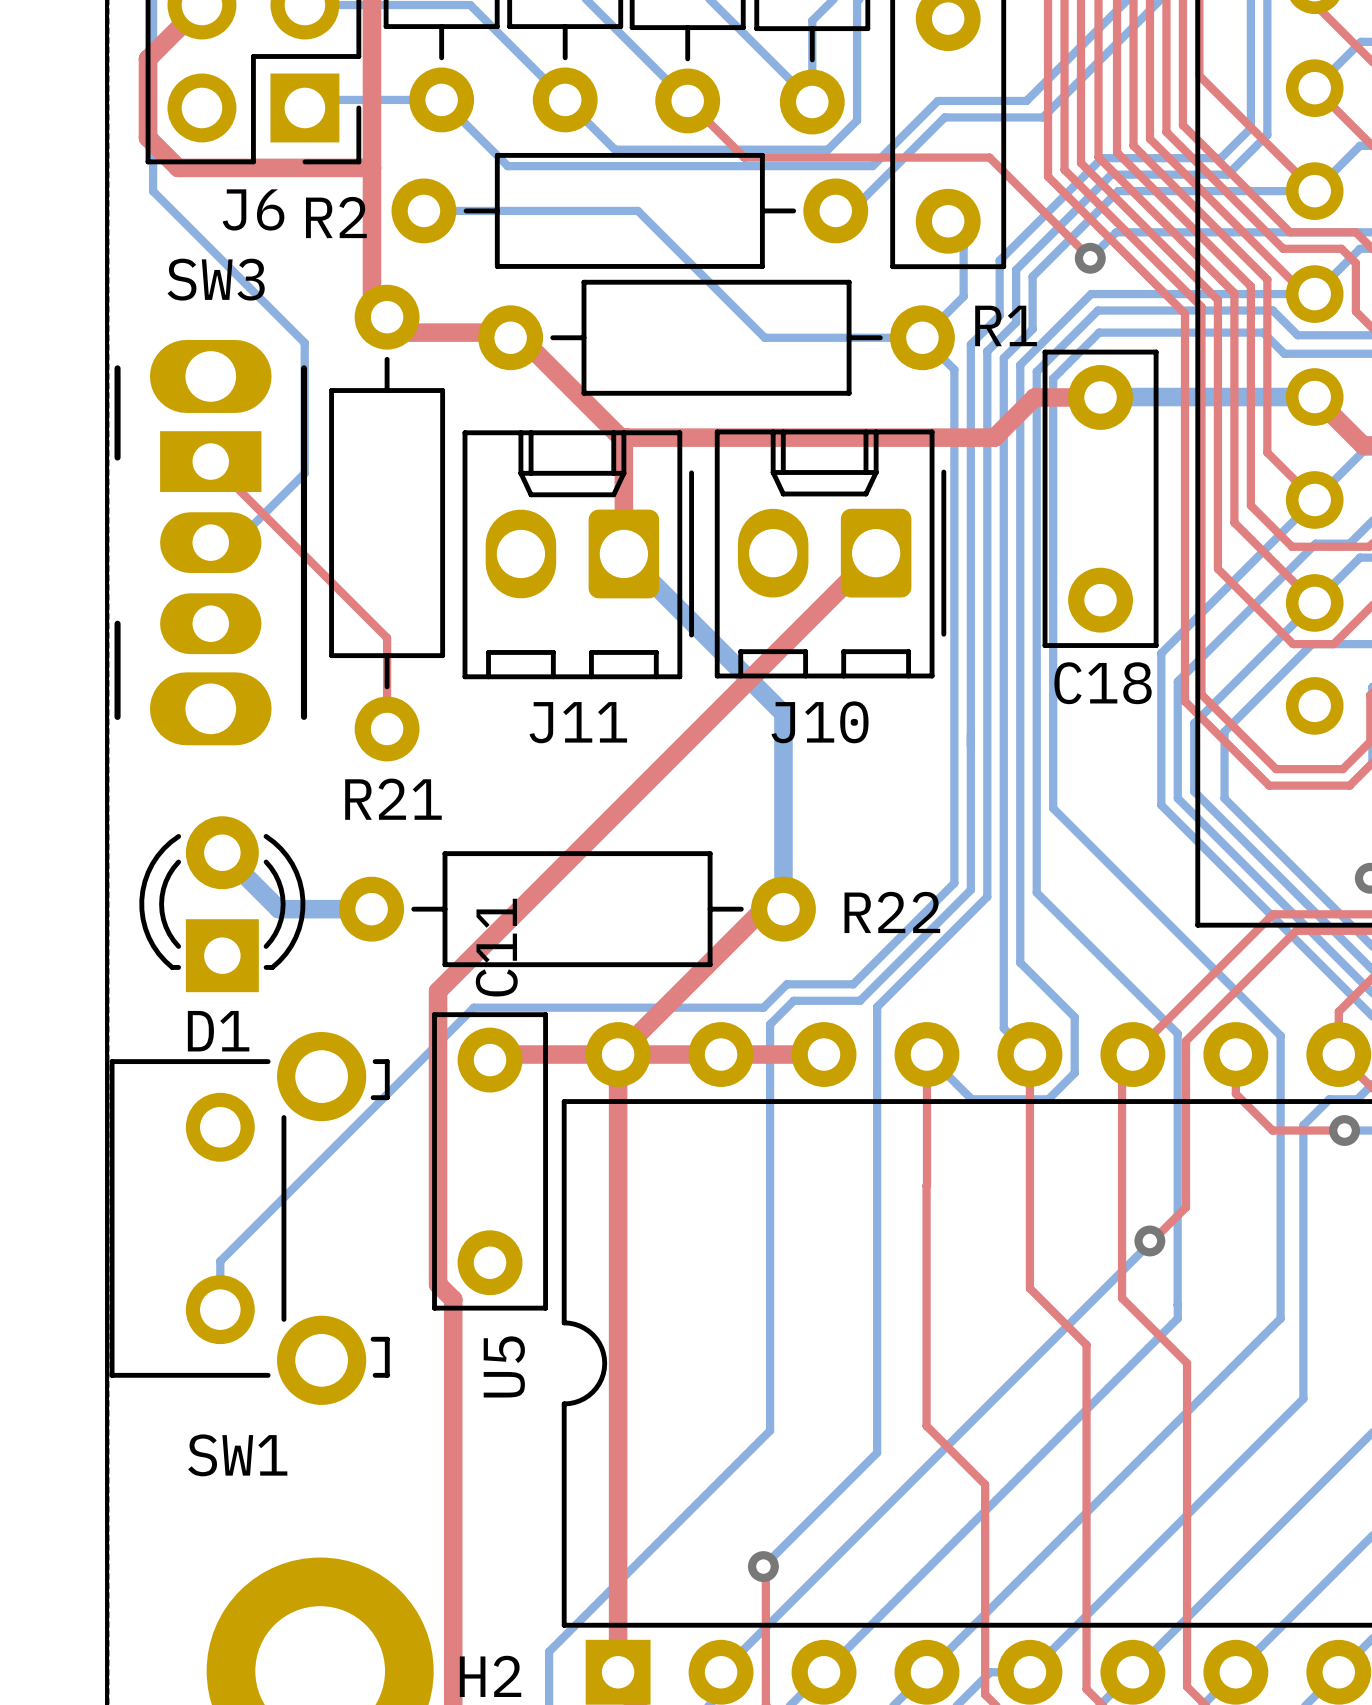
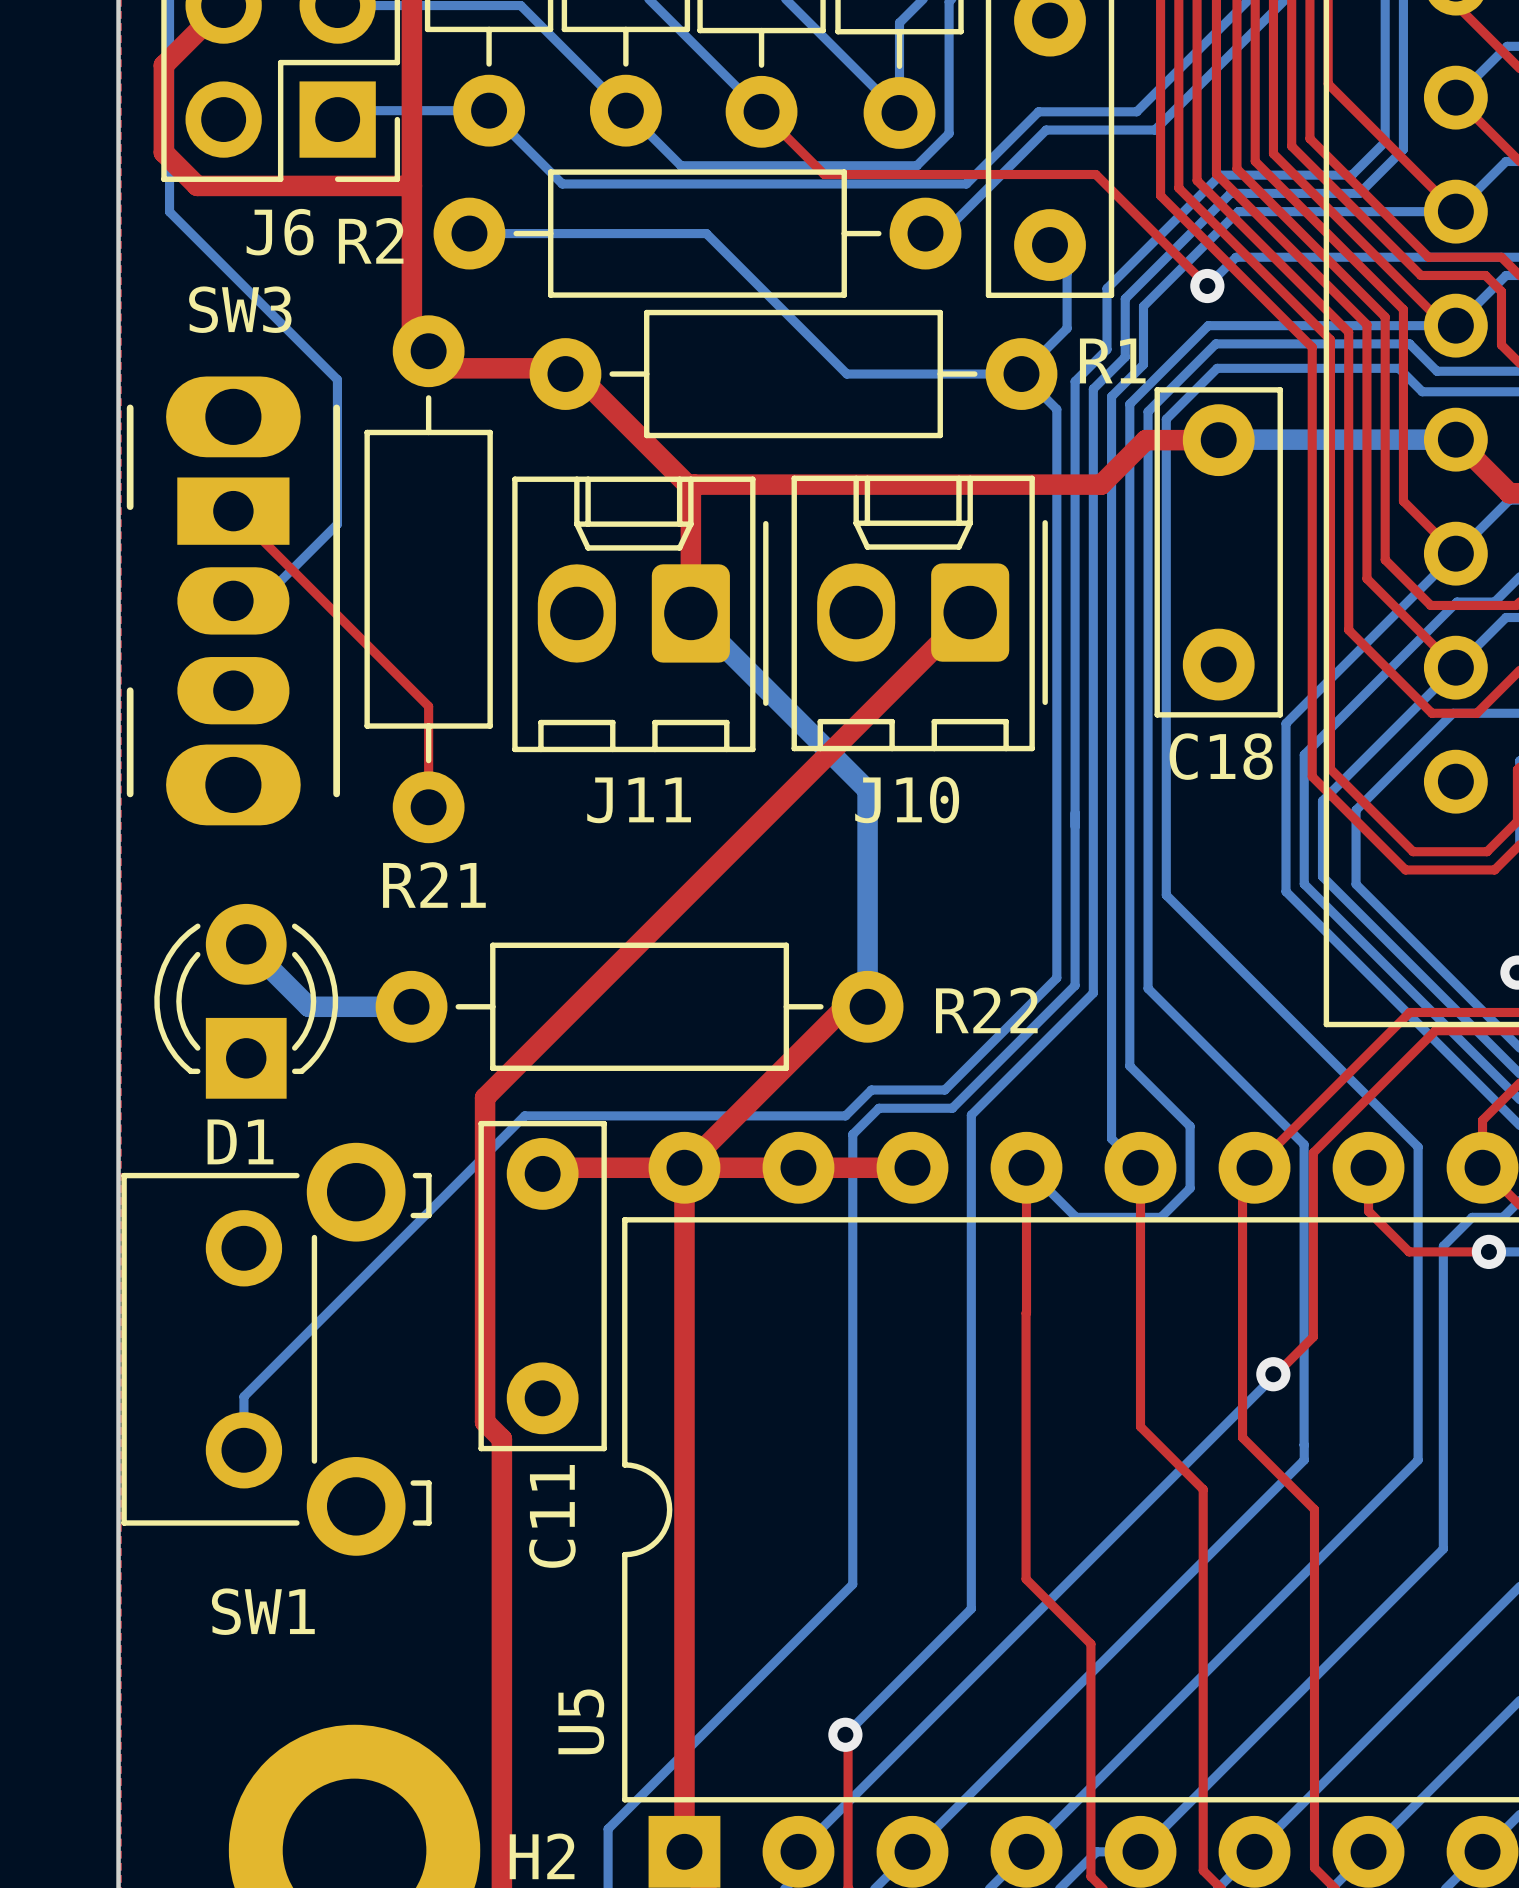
C11 name position: C11 (496, 947) -> C11 (552, 1516)
U5 name position: U5 (504, 1366) -> U5 (581, 1721)

